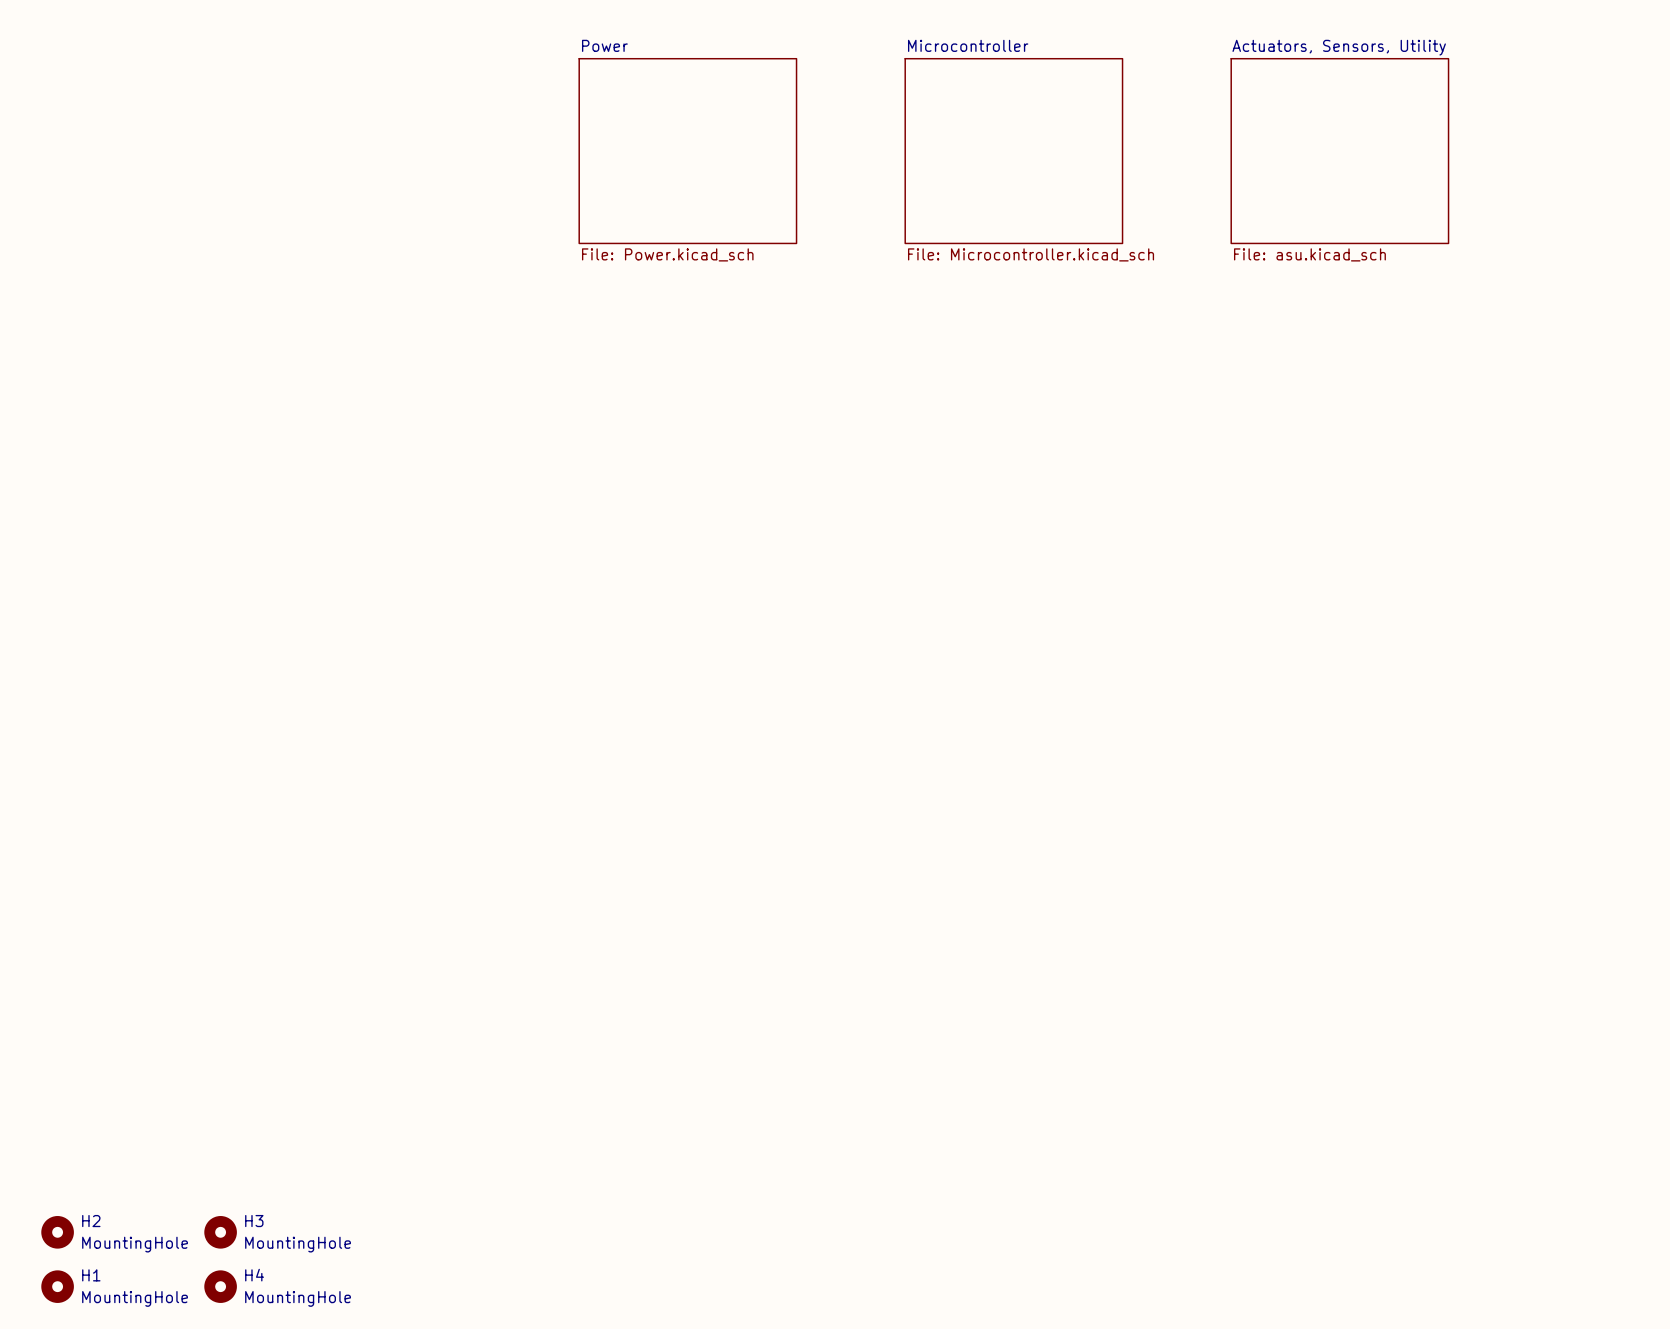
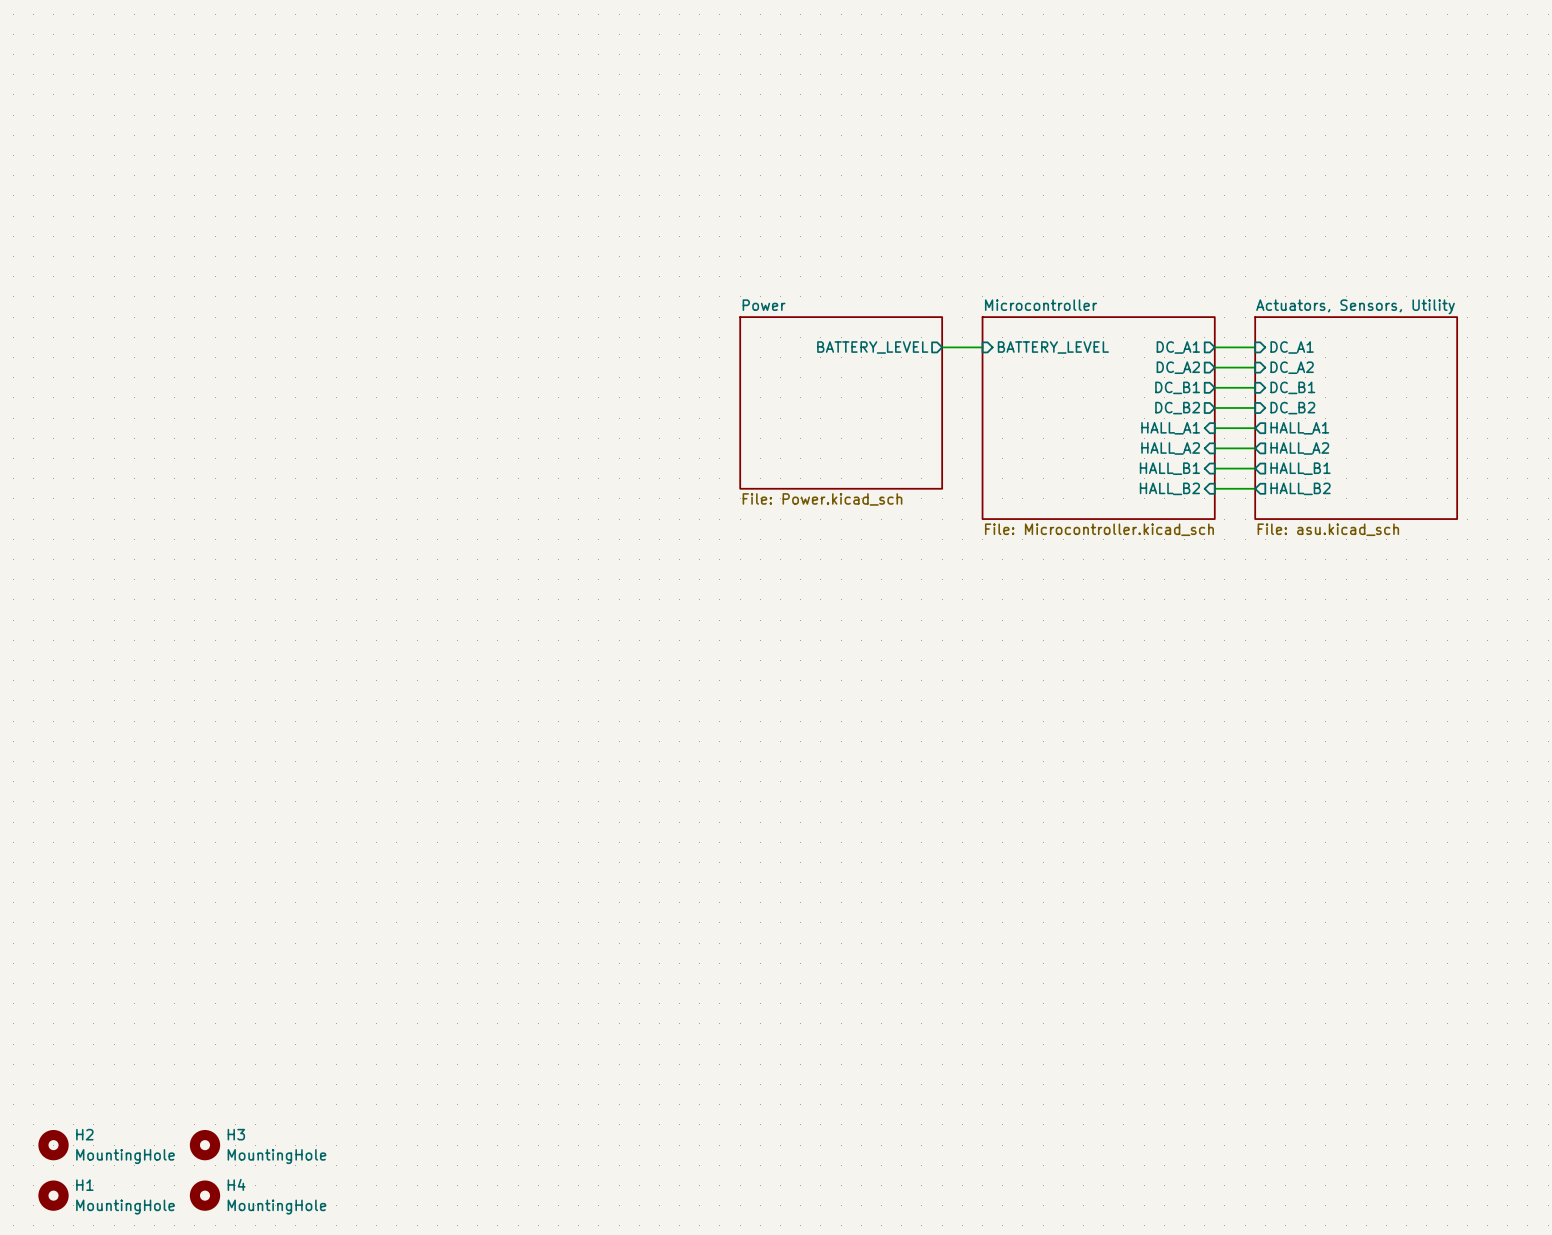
sheet Power: File: Power.kicad_sch (687, 151) -> none
sheet Microcontroller: File: Microcontroller.kicad_sch (1013, 151) -> none
sheet Actuators, Sensors, Utility: File: asu.kicad_sch (1339, 151) -> none
sheet pin: none -> BATTERY_LEVEL (872, 347)
wire: none -> (942, 347) (982, 347)
sheet pin: none -> BATTERY_LEVEL (1053, 347)
sheet pin: none -> DC_A1 (1178, 347)
wire: none -> (1214, 347) (1255, 347)
sheet pin: none -> DC_A1 (1292, 347)
sheet pin: none -> DC_A2 (1178, 367)
wire: none -> (1214, 367) (1255, 367)
sheet pin: none -> DC_A2 (1292, 367)
sheet pin: none -> DC_B1 (1177, 387)
wire: none -> (1214, 387) (1255, 387)
sheet pin: none -> DC_B1 (1292, 387)
sheet Power: none -> File: Power.kicad_sch (841, 402)
sheet pin: none -> DC_B2 (1177, 408)
wire: none -> (1214, 407) (1255, 407)
sheet pin: none -> DC_B2 (1292, 408)
sheet Microcontroller: none -> File: Microcontroller.kicad_sch (1098, 418)
sheet Actuators, Sensors, Utility: none -> File: asu.kicad_sch (1356, 418)
sheet pin: none -> HALL_A1 (1170, 428)
wire: none -> (1214, 428) (1255, 428)
sheet pin: none -> HALL_A1 (1299, 428)
sheet pin: none -> HALL_A2 (1170, 448)
wire: none -> (1214, 448) (1255, 448)
sheet pin: none -> HALL_A2 (1299, 448)
sheet pin: none -> HALL_B1 (1169, 468)
wire: none -> (1214, 468) (1255, 468)
sheet pin: none -> HALL_B1 (1300, 468)
wire: none -> (1214, 488) (1255, 488)
sheet pin: none -> HALL_B2 (1169, 488)
sheet pin: none -> HALL_B2 (1300, 488)

